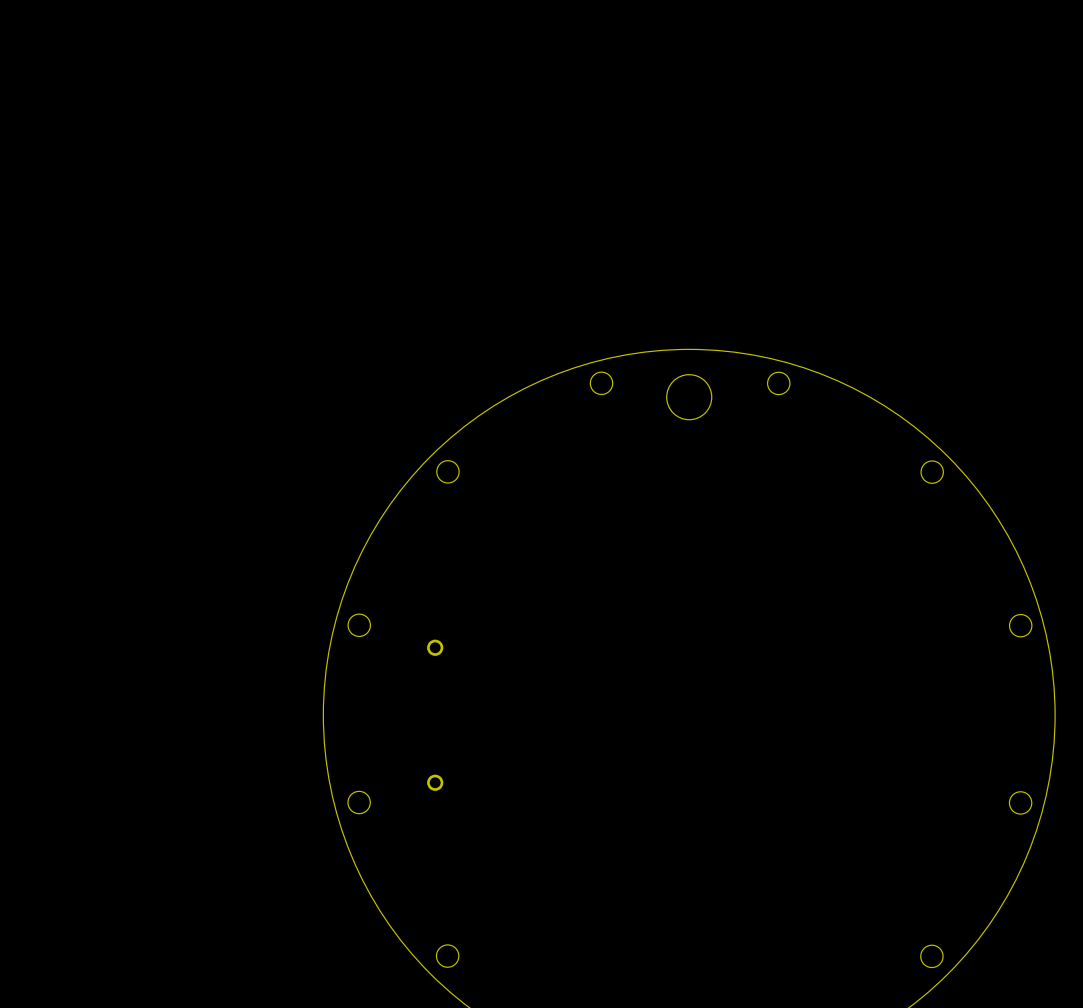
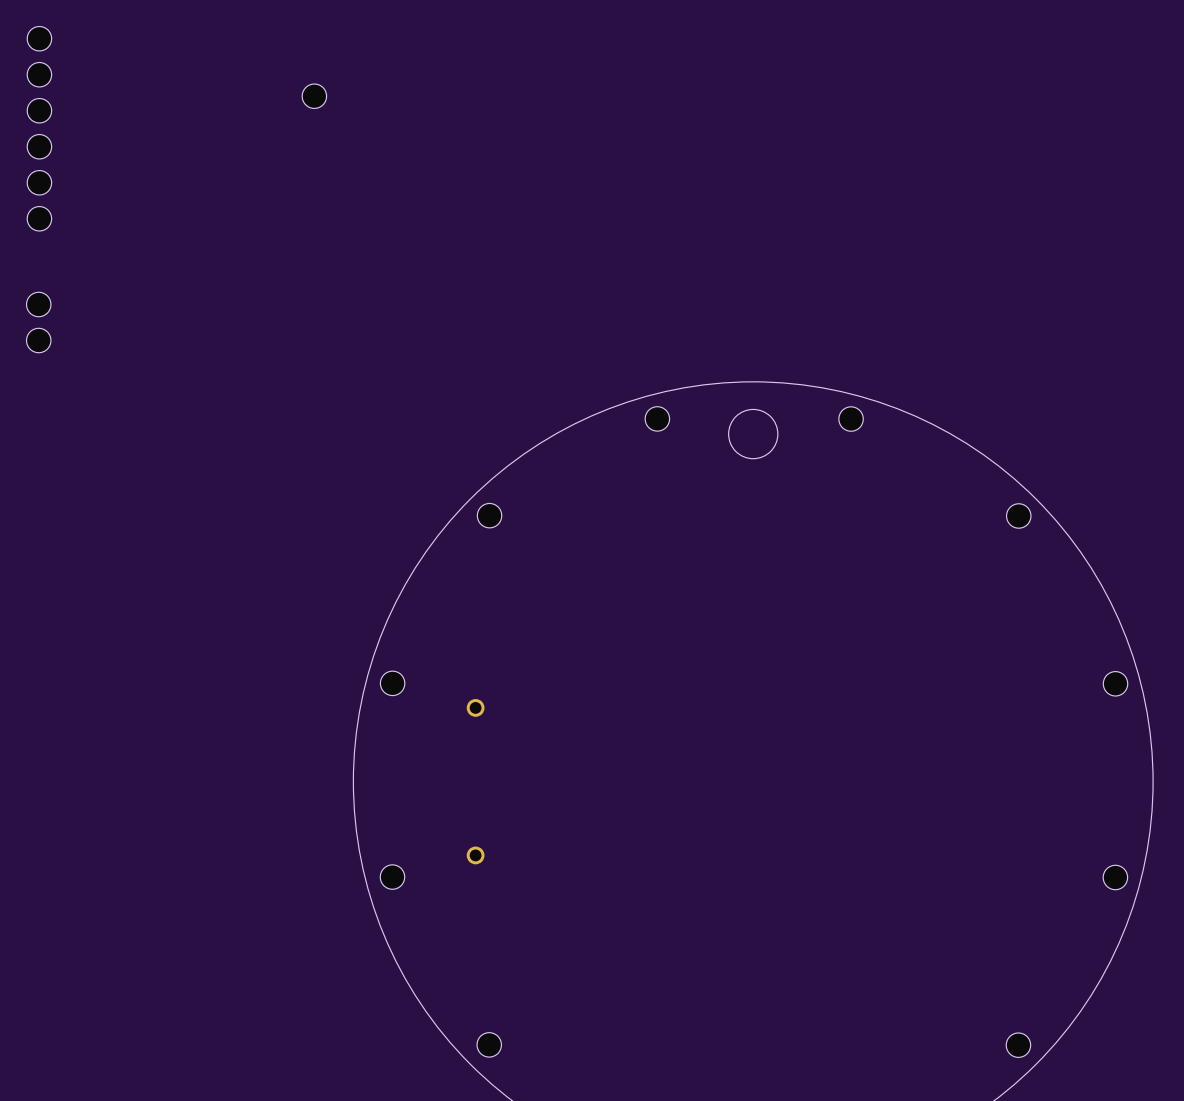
part: none -> (39, 38)
part: none -> (39, 74)
part: none -> (314, 96)
part: none -> (39, 110)
part: none -> (39, 146)
part: none -> (39, 182)
part: none -> (39, 218)
part: none -> (38, 304)
part: none -> (38, 340)

